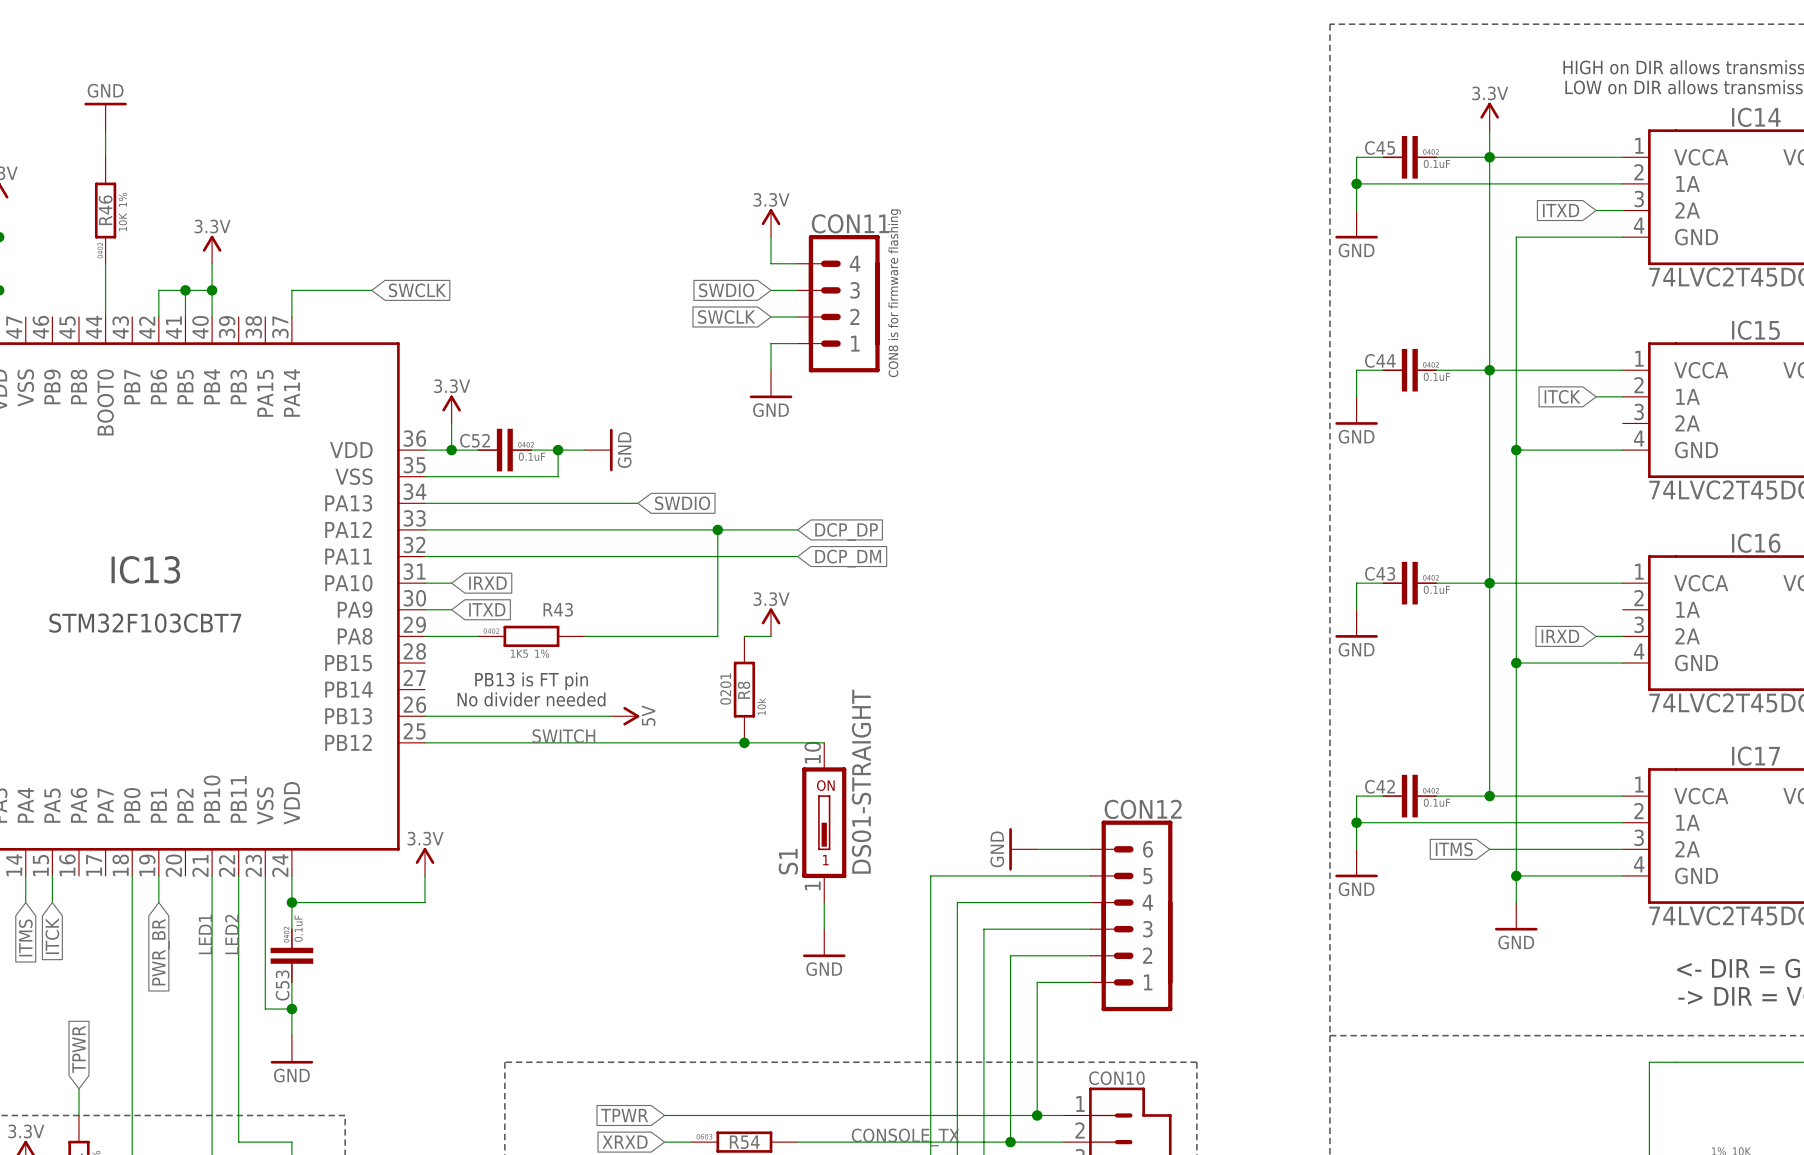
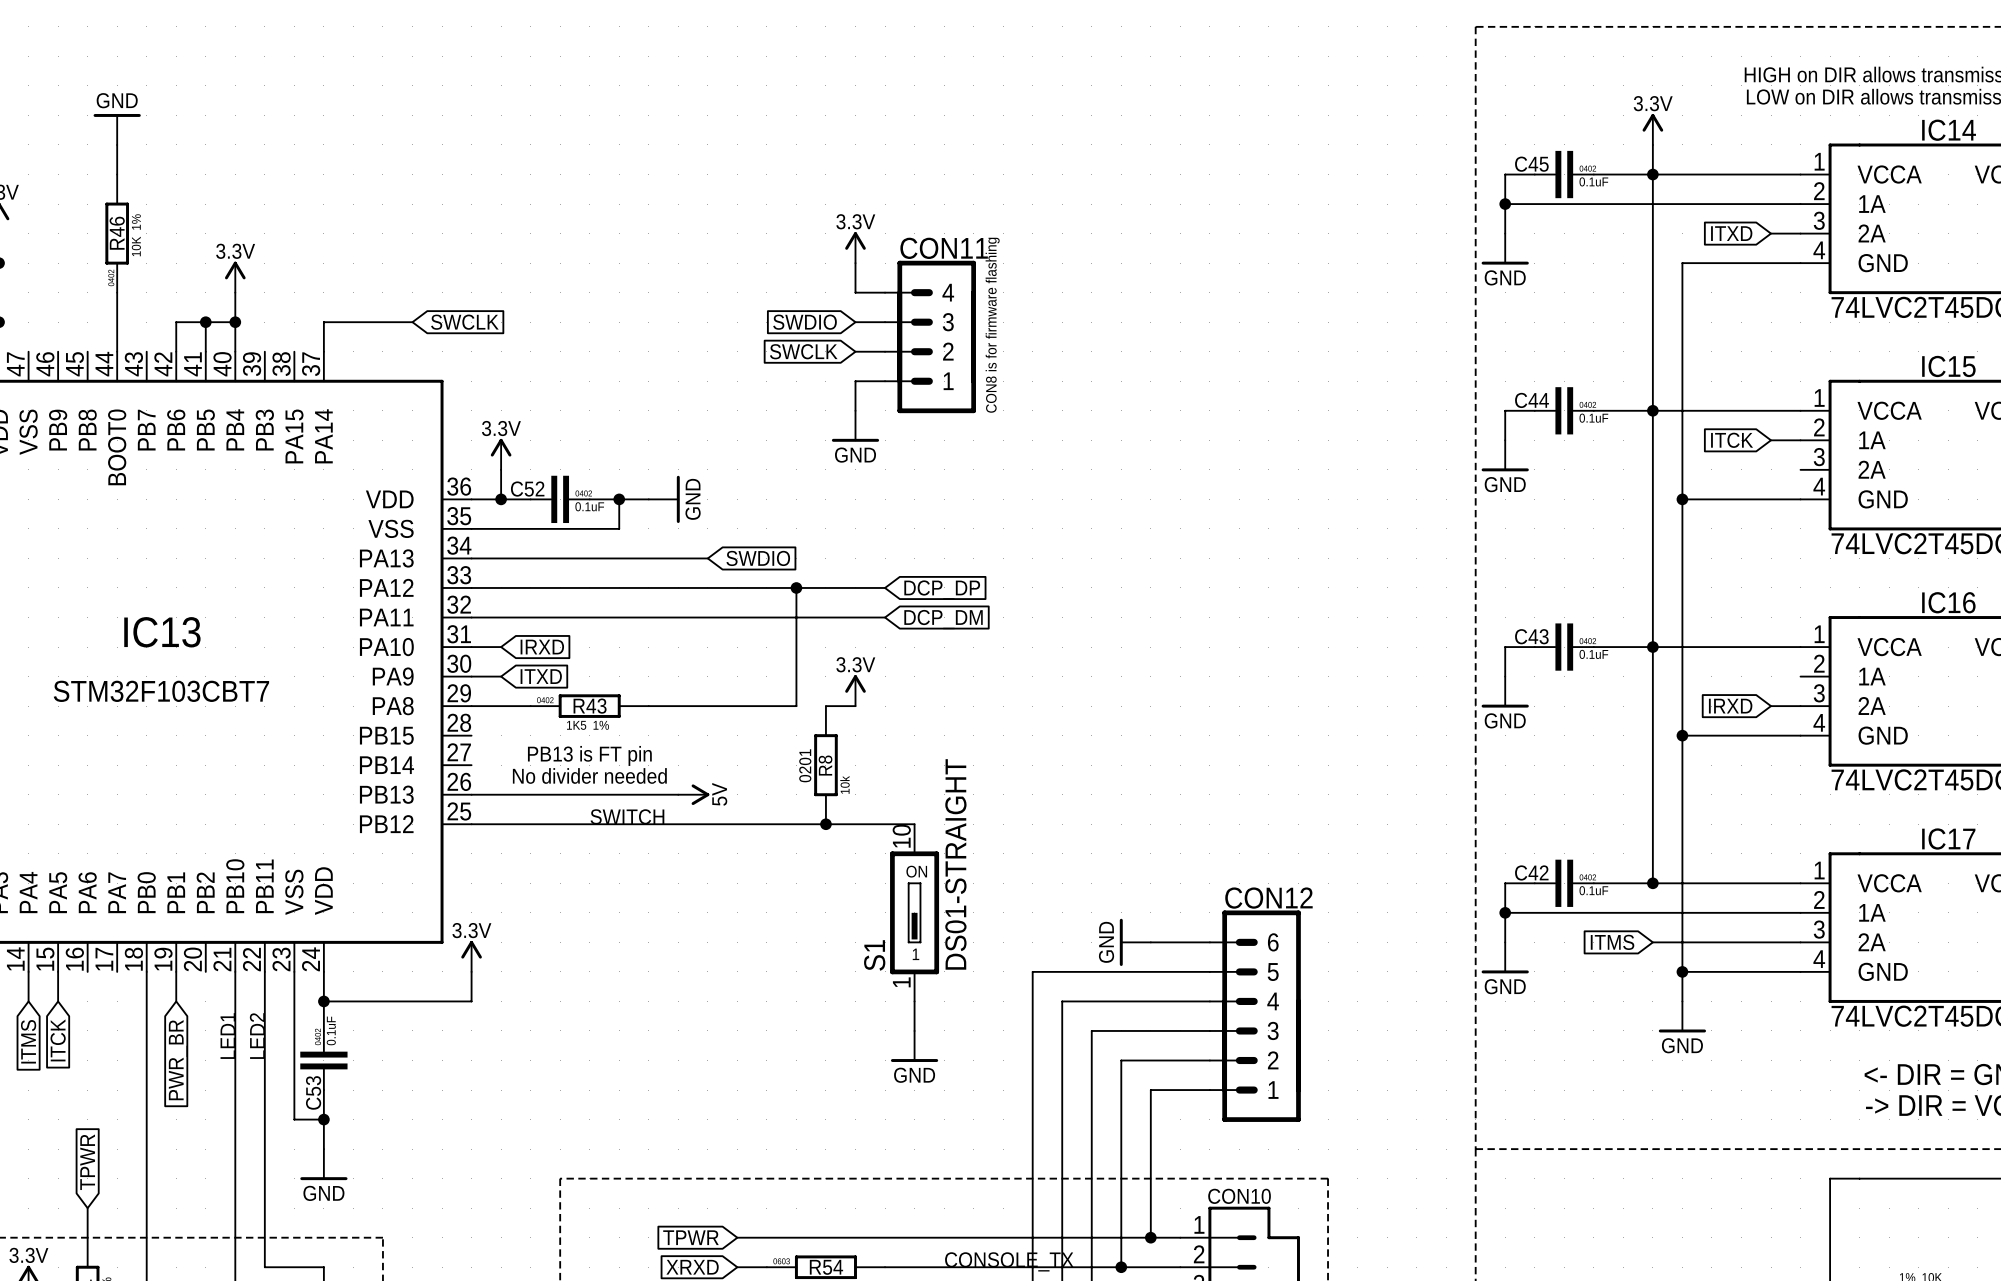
R43 name position: R43 (558, 609) -> R43 (590, 706)

